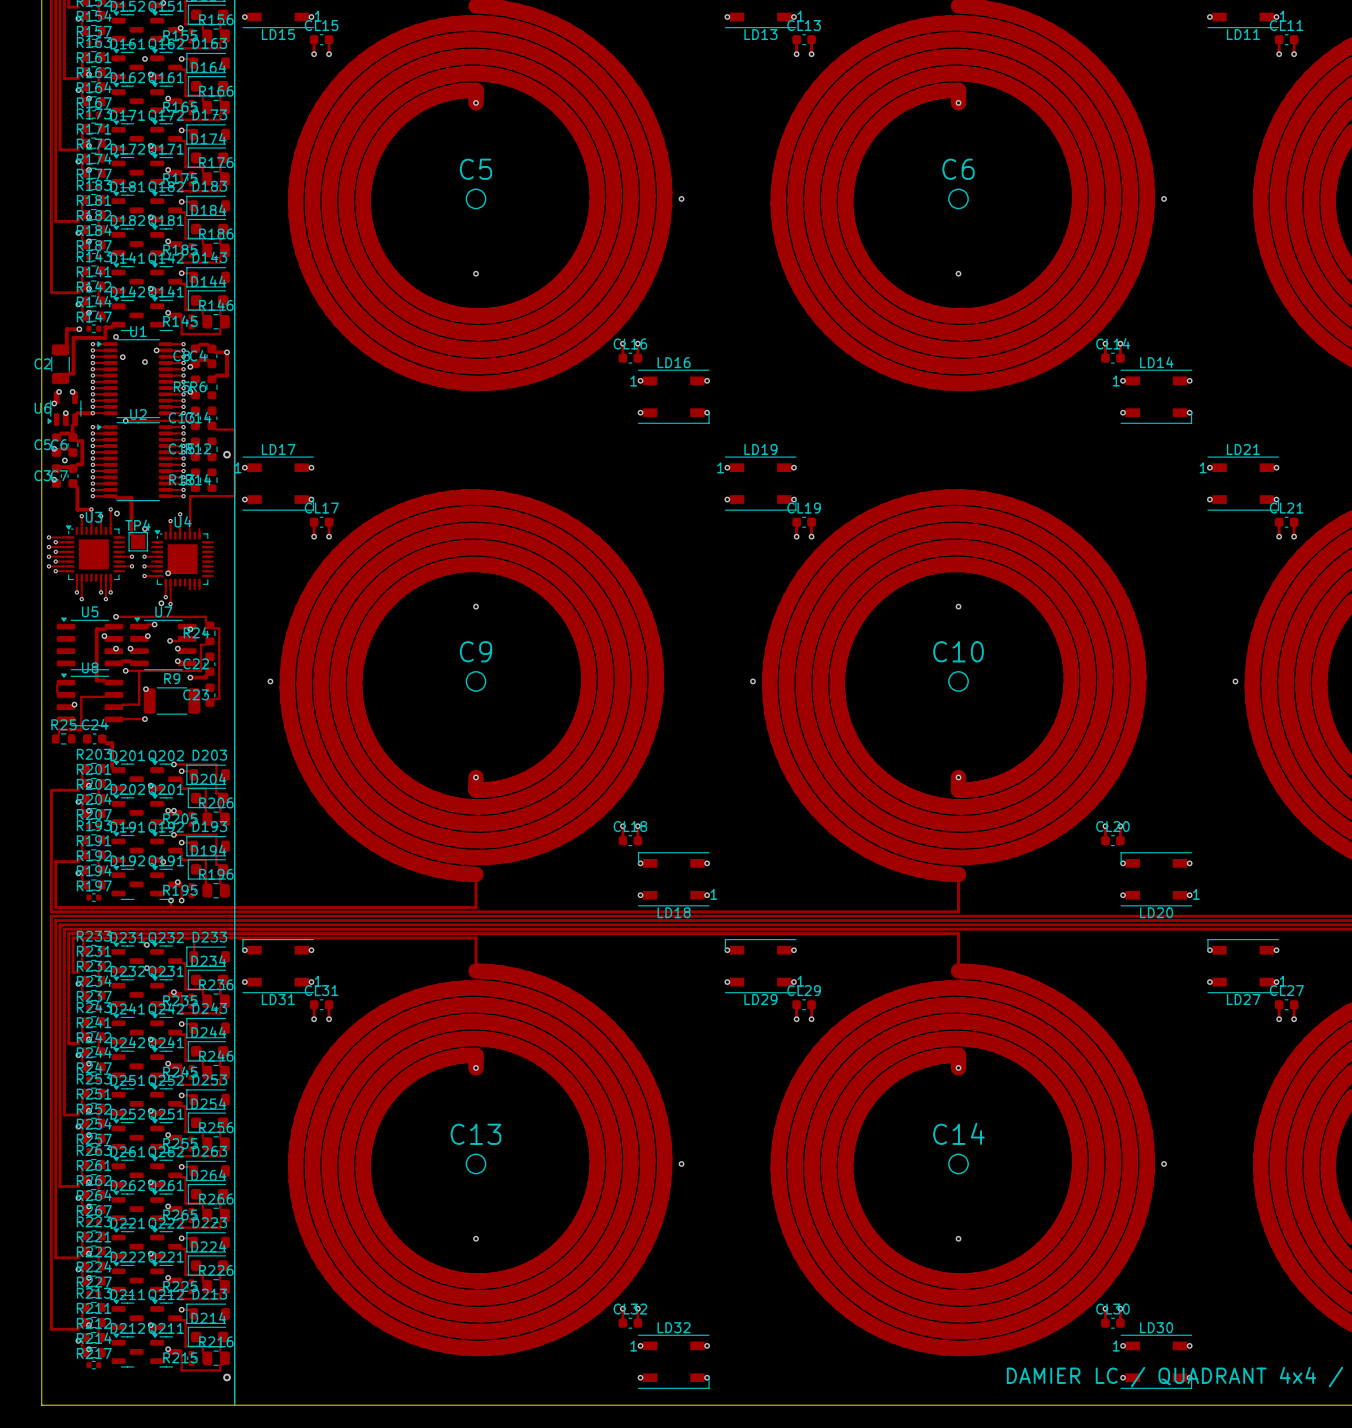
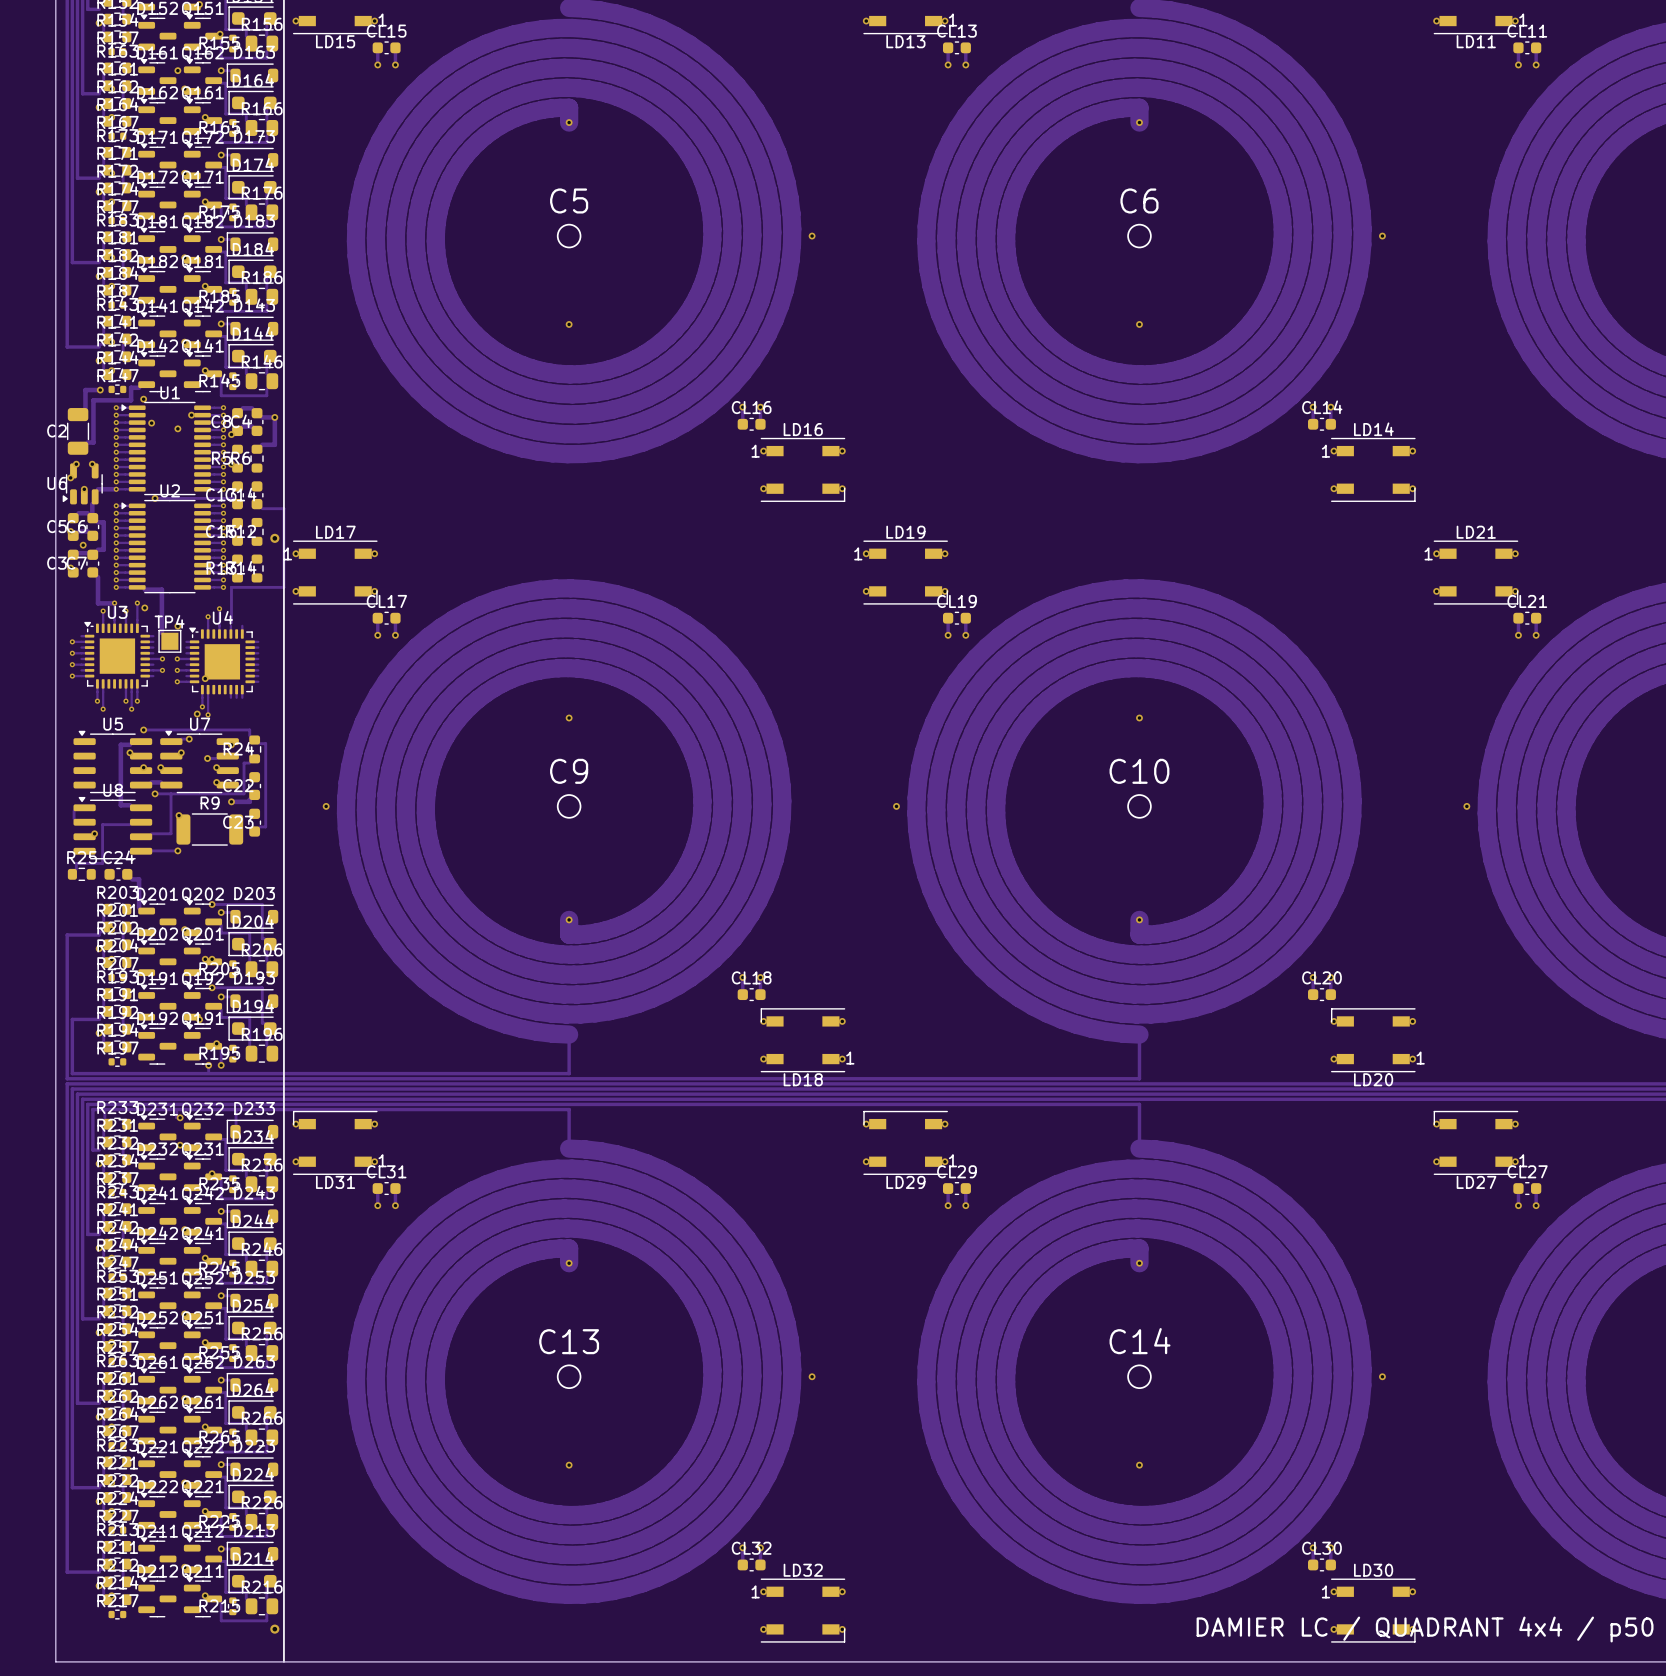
track: (48, 537) (63, 537) -> none
via: (48, 537) -> none
track: (48, 547) (63, 547) -> none
via: (48, 547) -> none
track: (48, 556) (63, 556) -> none
via: (48, 556) -> none
track: (48, 566) (63, 566) -> none
via: (48, 566) -> none

